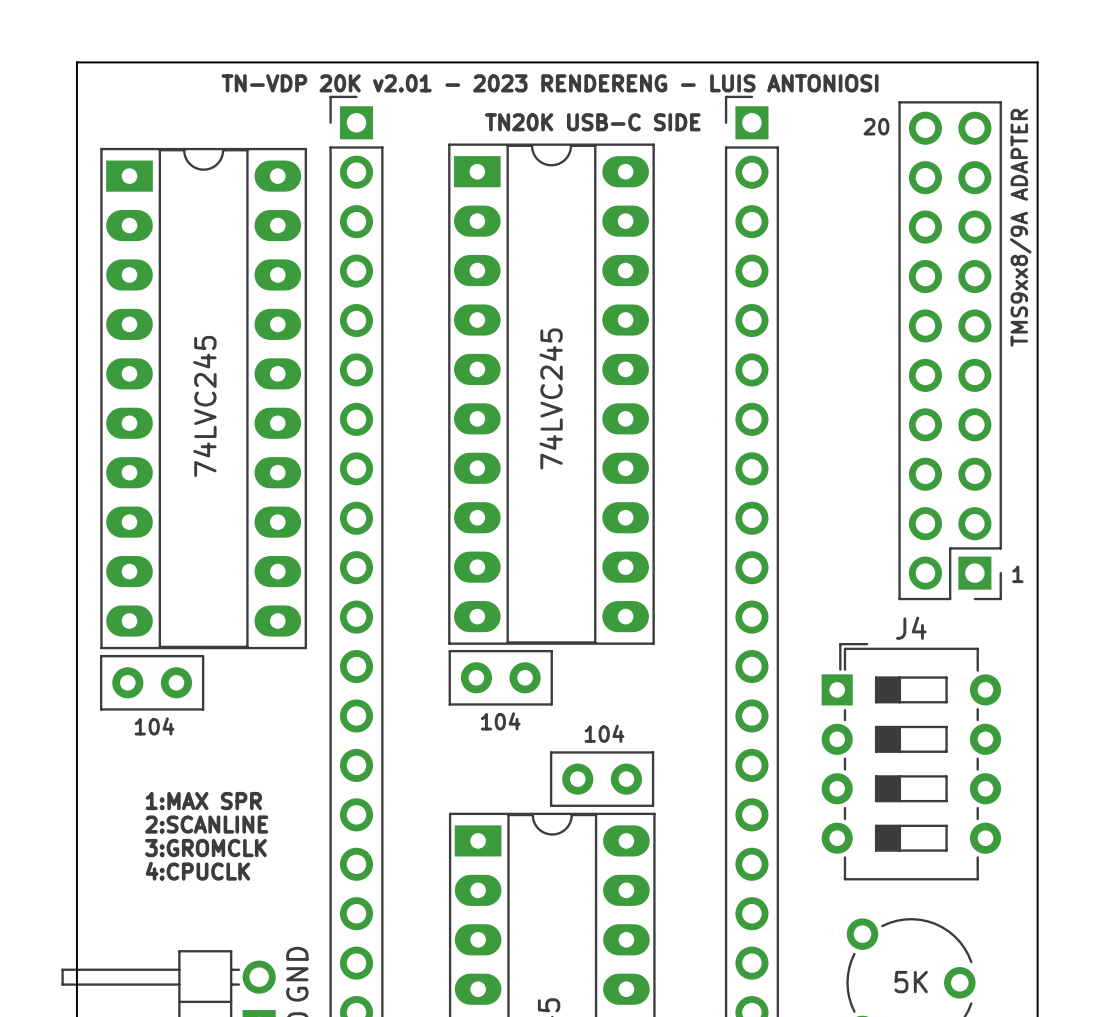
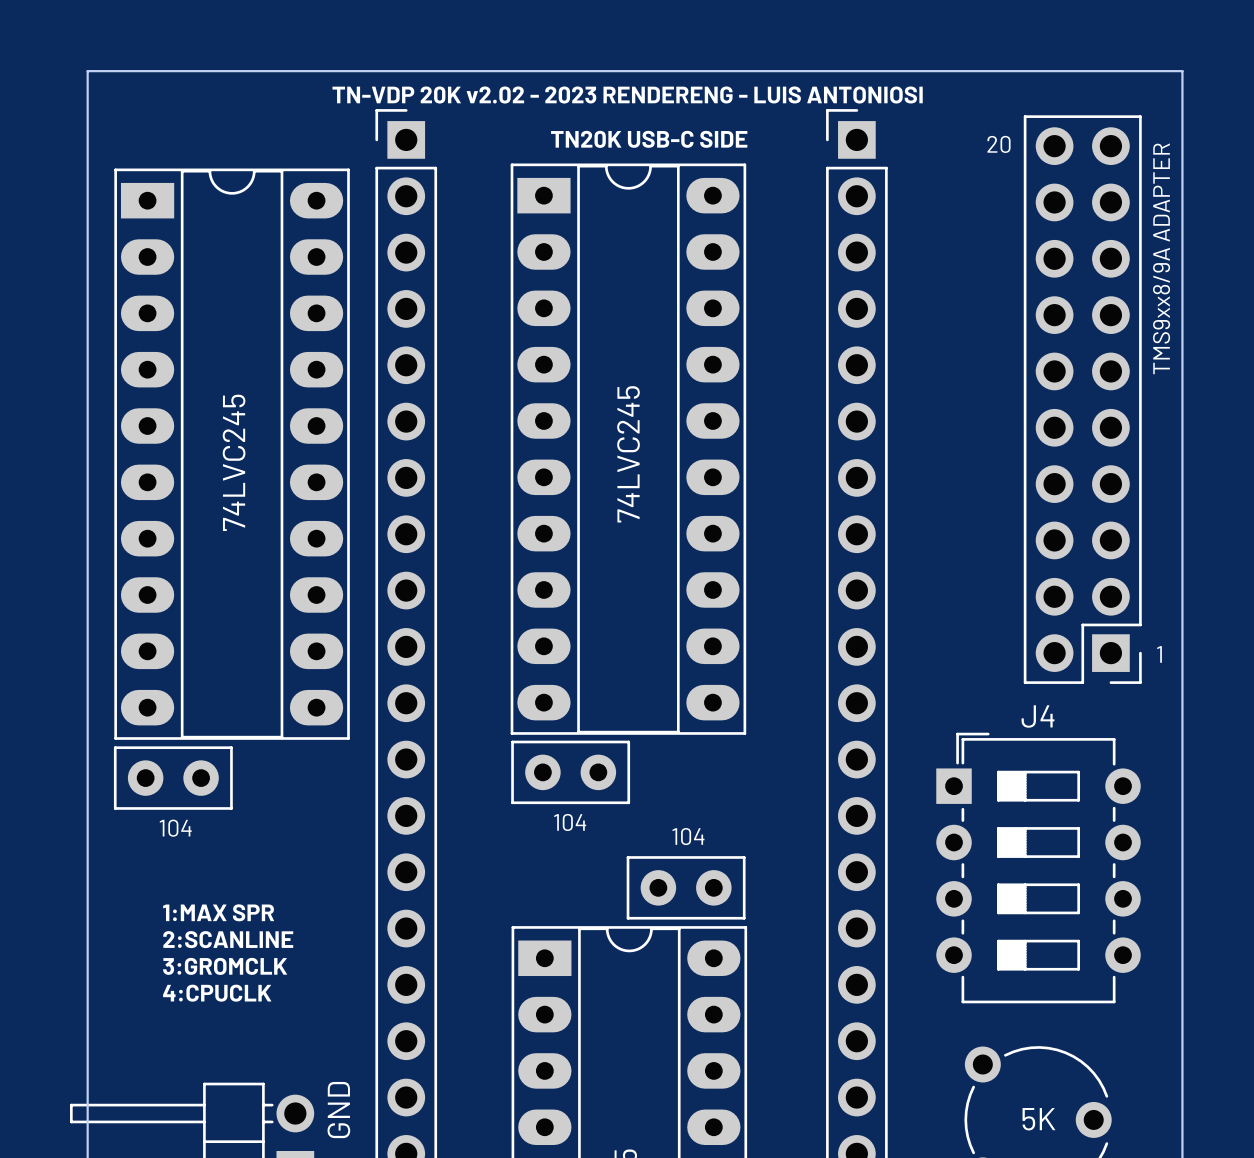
text: TN-VDP 20K v2.01 - 2023 RENDERENG - LUIS ANTONIOSI (550, 83) -> TN-VDP 20K v2.02 - 2023 RENDERENG - LUIS ANTONIOSI (627, 95)

